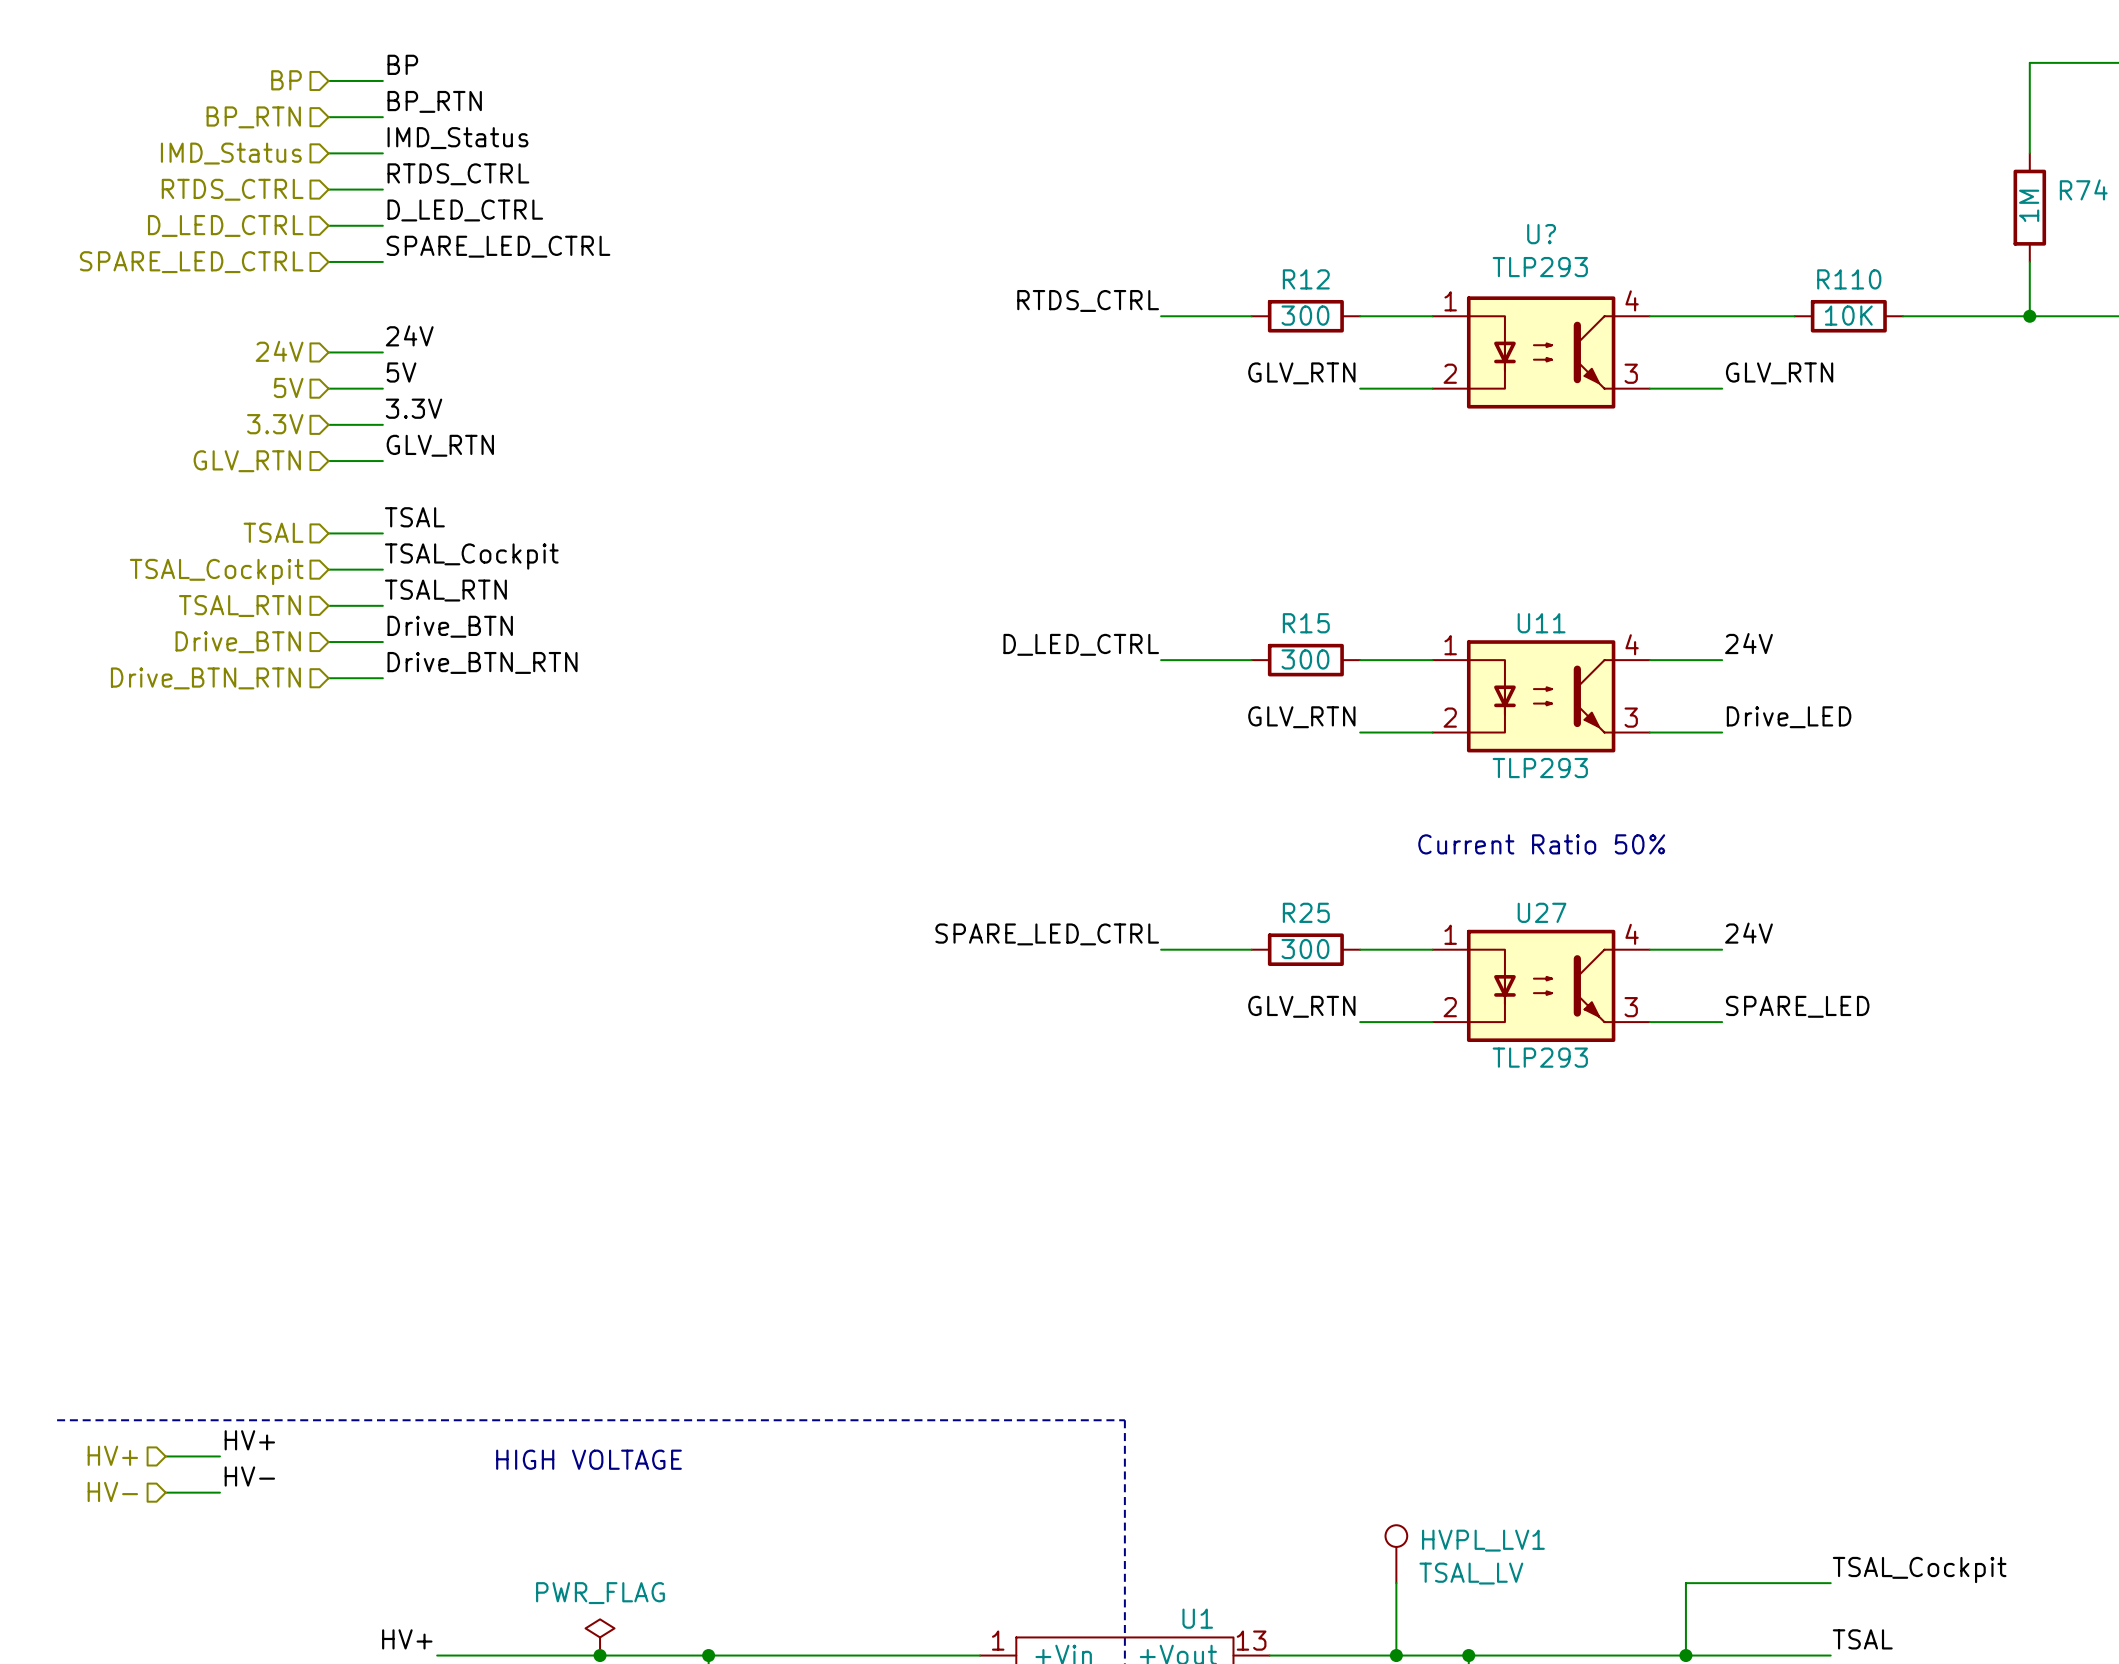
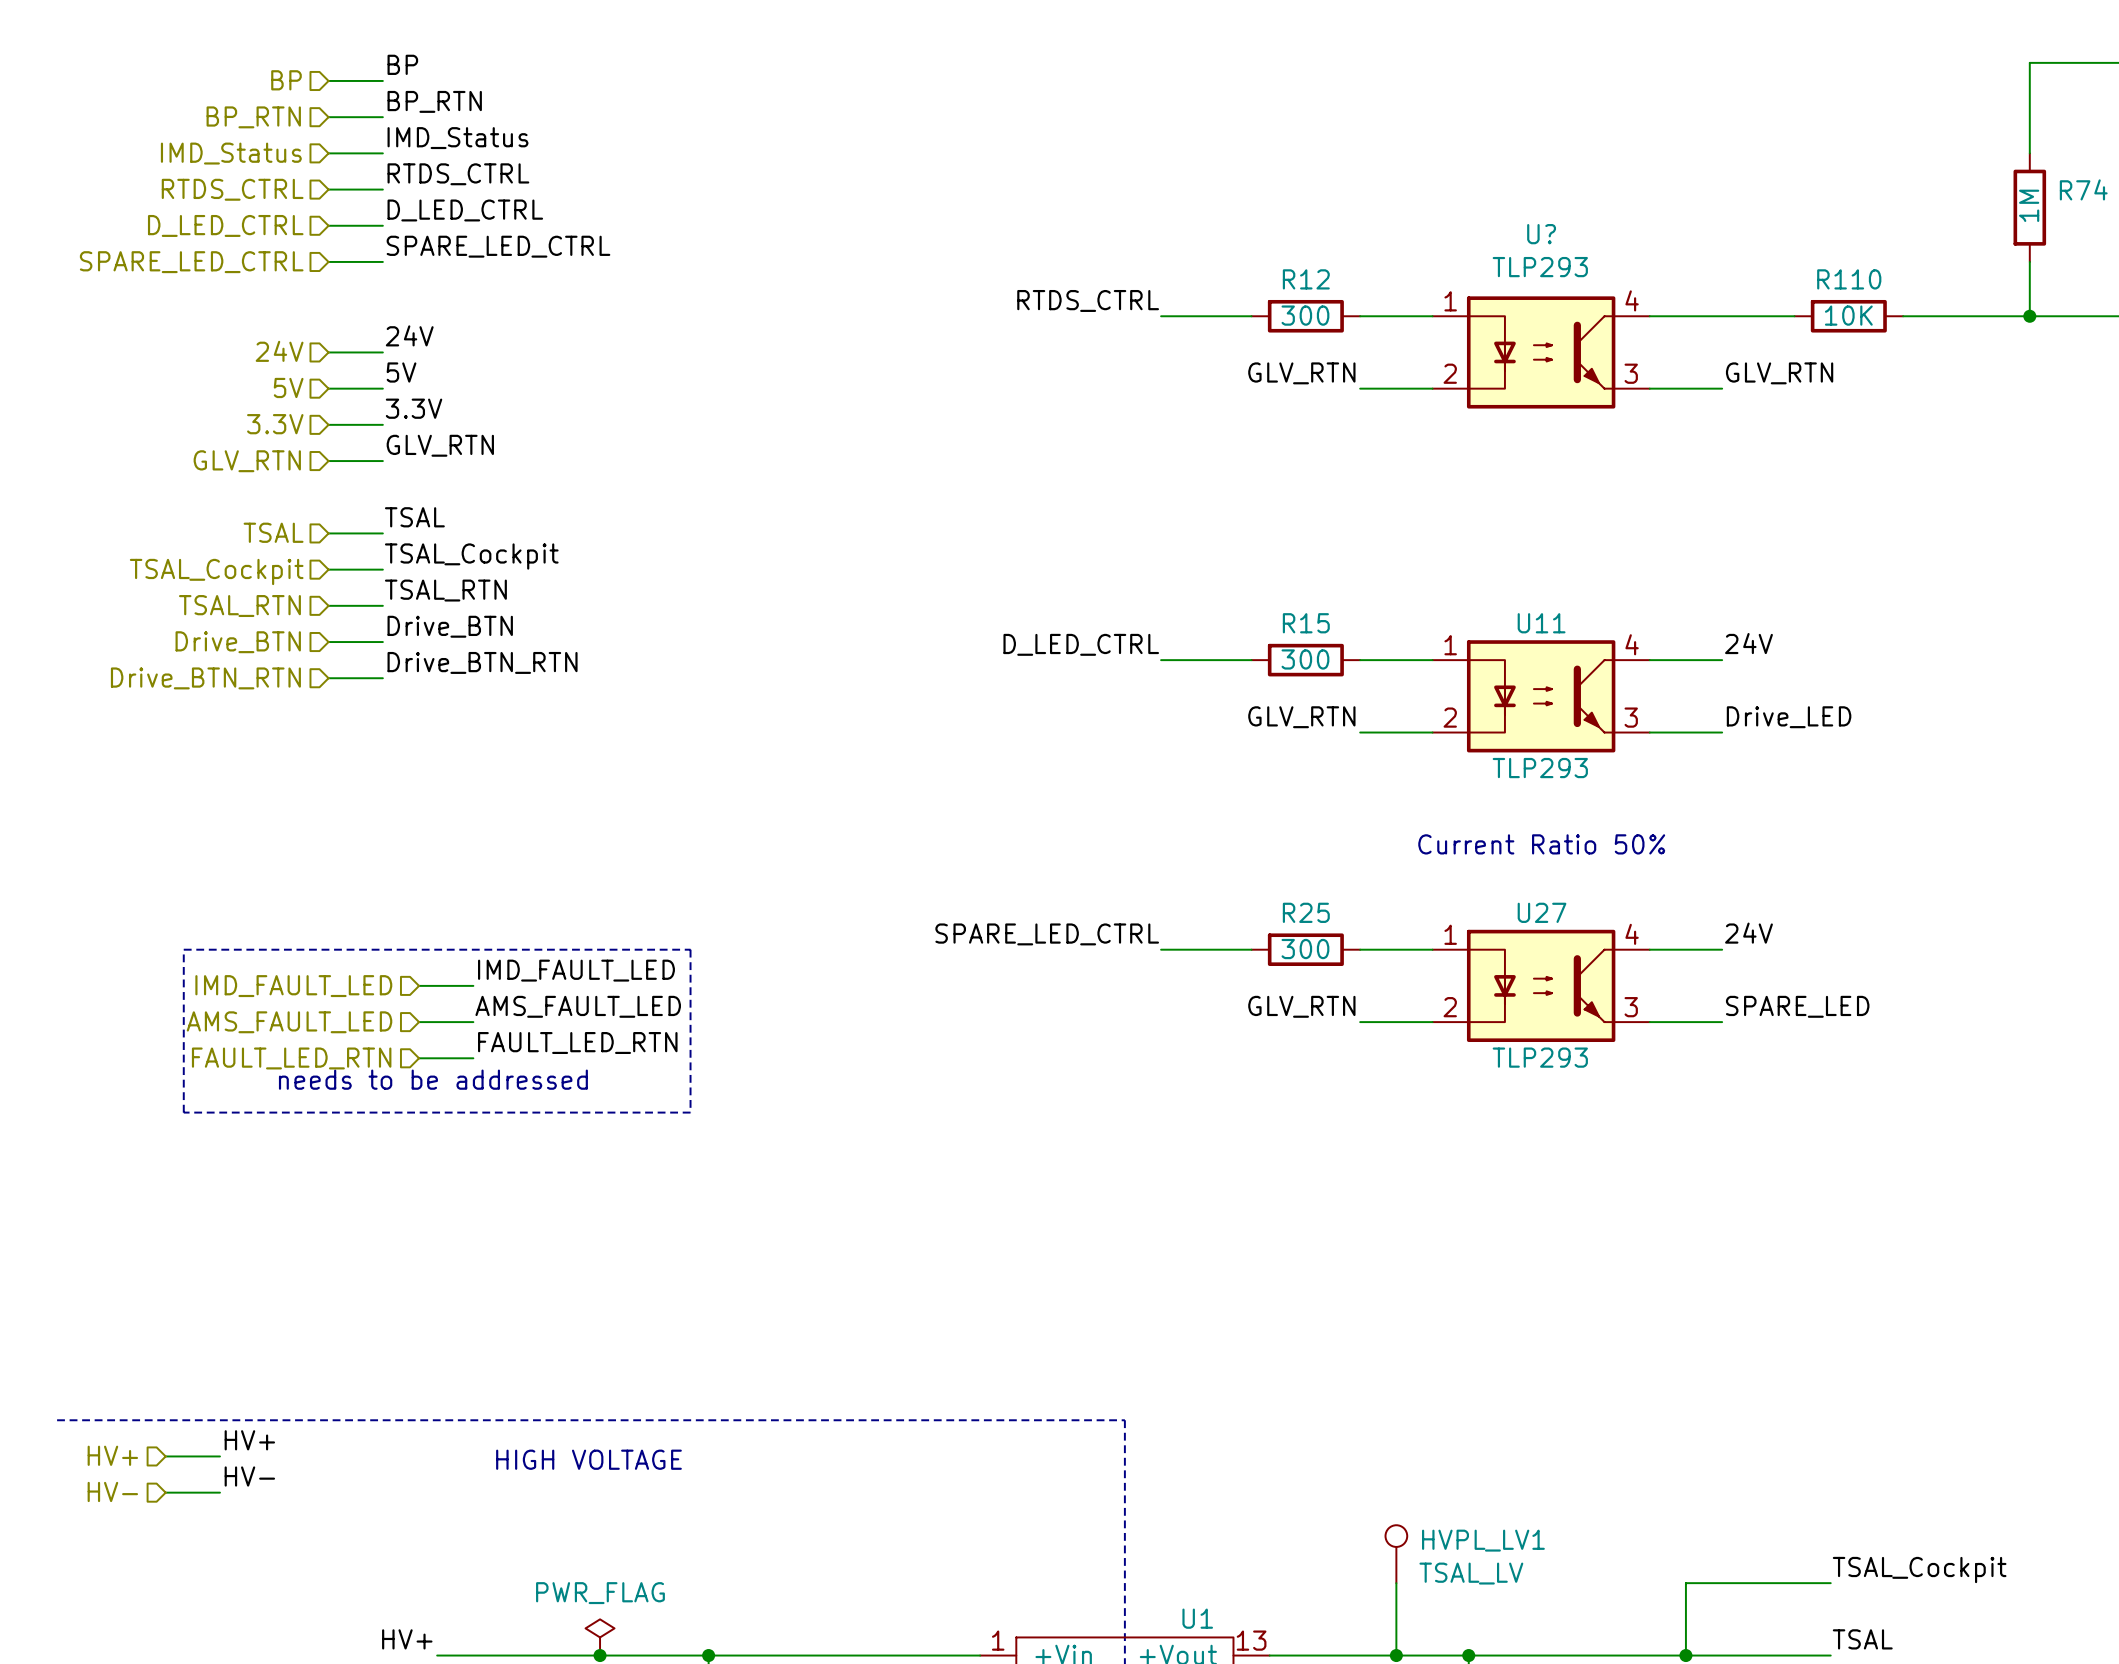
line: none -> (183, 949) (183, 1112) (690, 1112) (690, 949) (183, 949)
label: none -> IMD_FAULT_LED (576, 970)
wire: none -> (419, 985) (473, 985)
hierarchical label: none -> IMD_FAULT_LED (293, 986)
label: none -> AMS_FAULT_LED (578, 1006)
hierarchical label: none -> AMS_FAULT_LED (289, 1022)
wire: none -> (419, 1022) (473, 1022)
label: none -> FAULT_LED_RTN (577, 1043)
hierarchical label: none -> FAULT_LED_RTN (291, 1058)
wire: none -> (419, 1058) (473, 1058)
text: none -> needs to be addressed (433, 1079)

